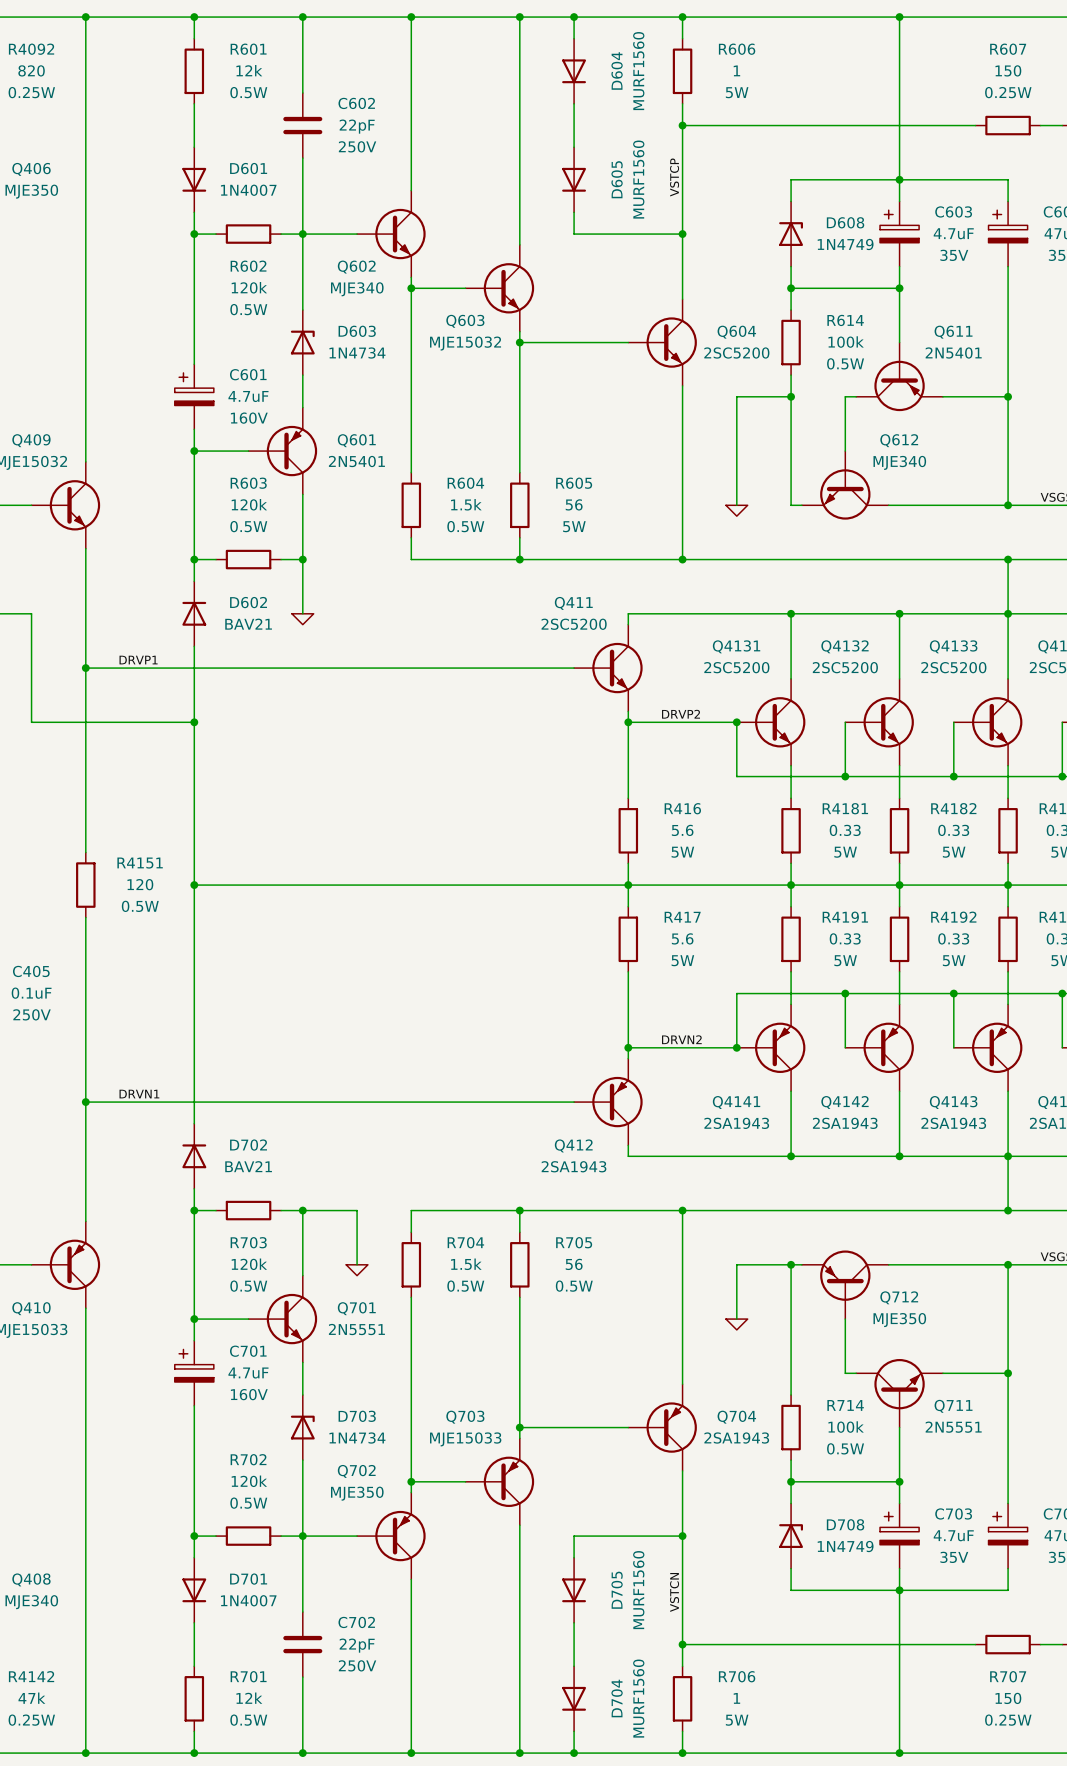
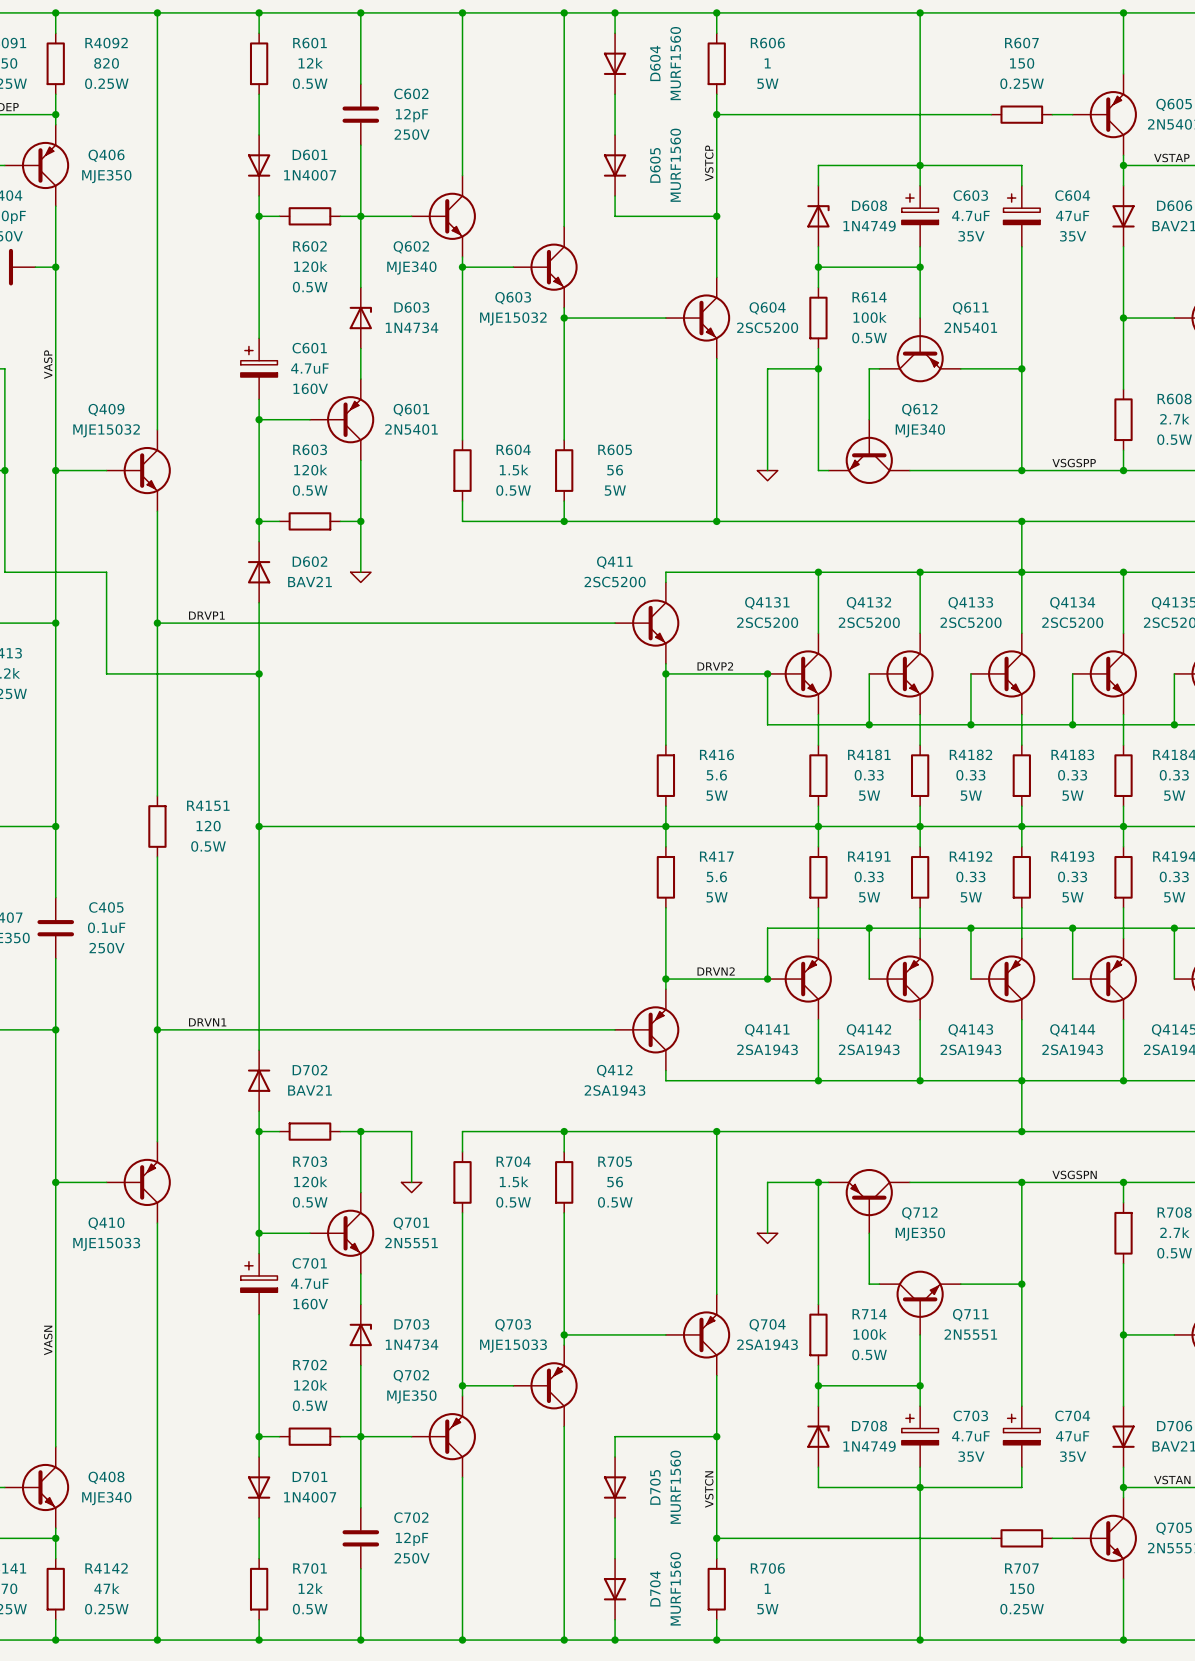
C602 value: 22pF (357, 126) -> 12pF (412, 115)
C702 value: 22pF (357, 1645) -> 12pF (412, 1539)

